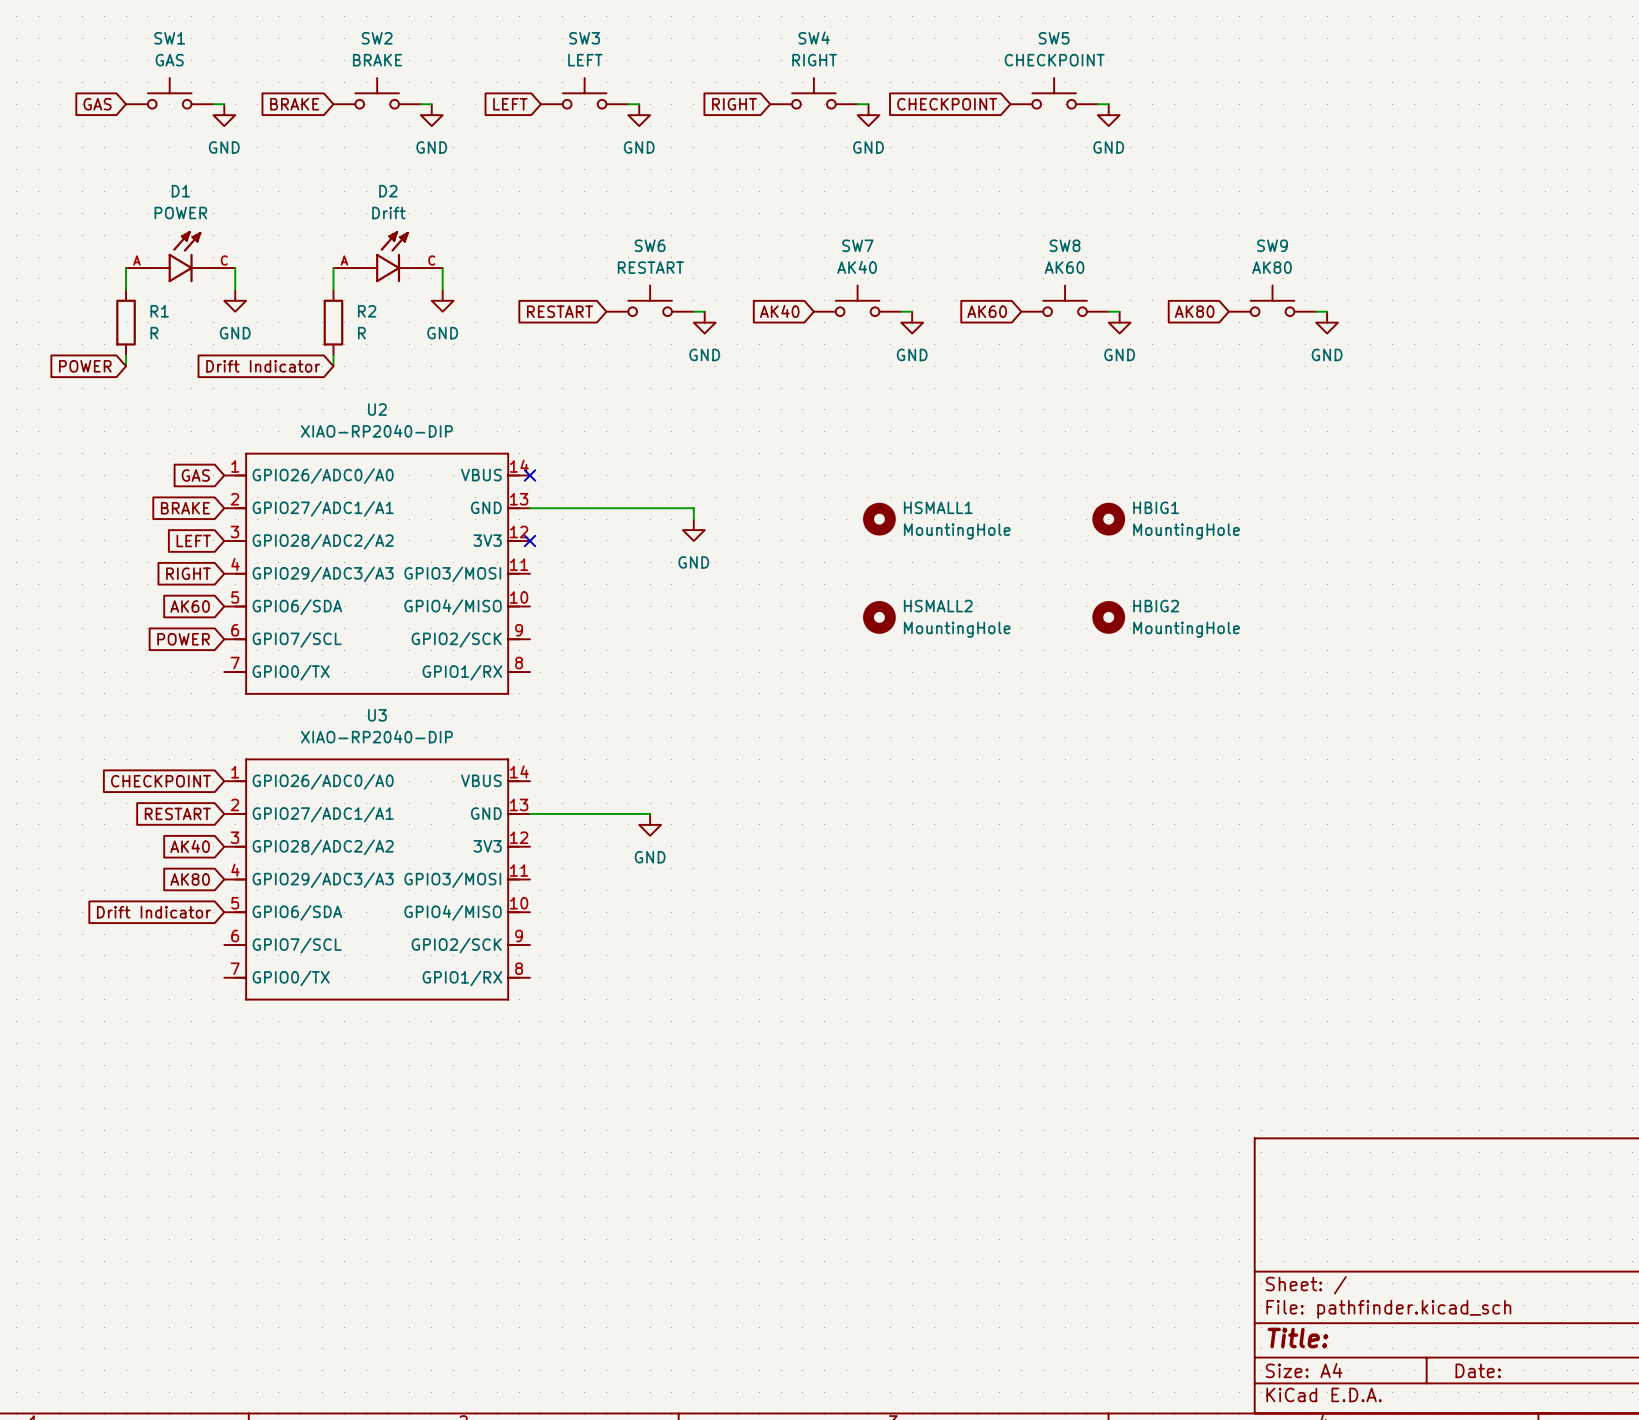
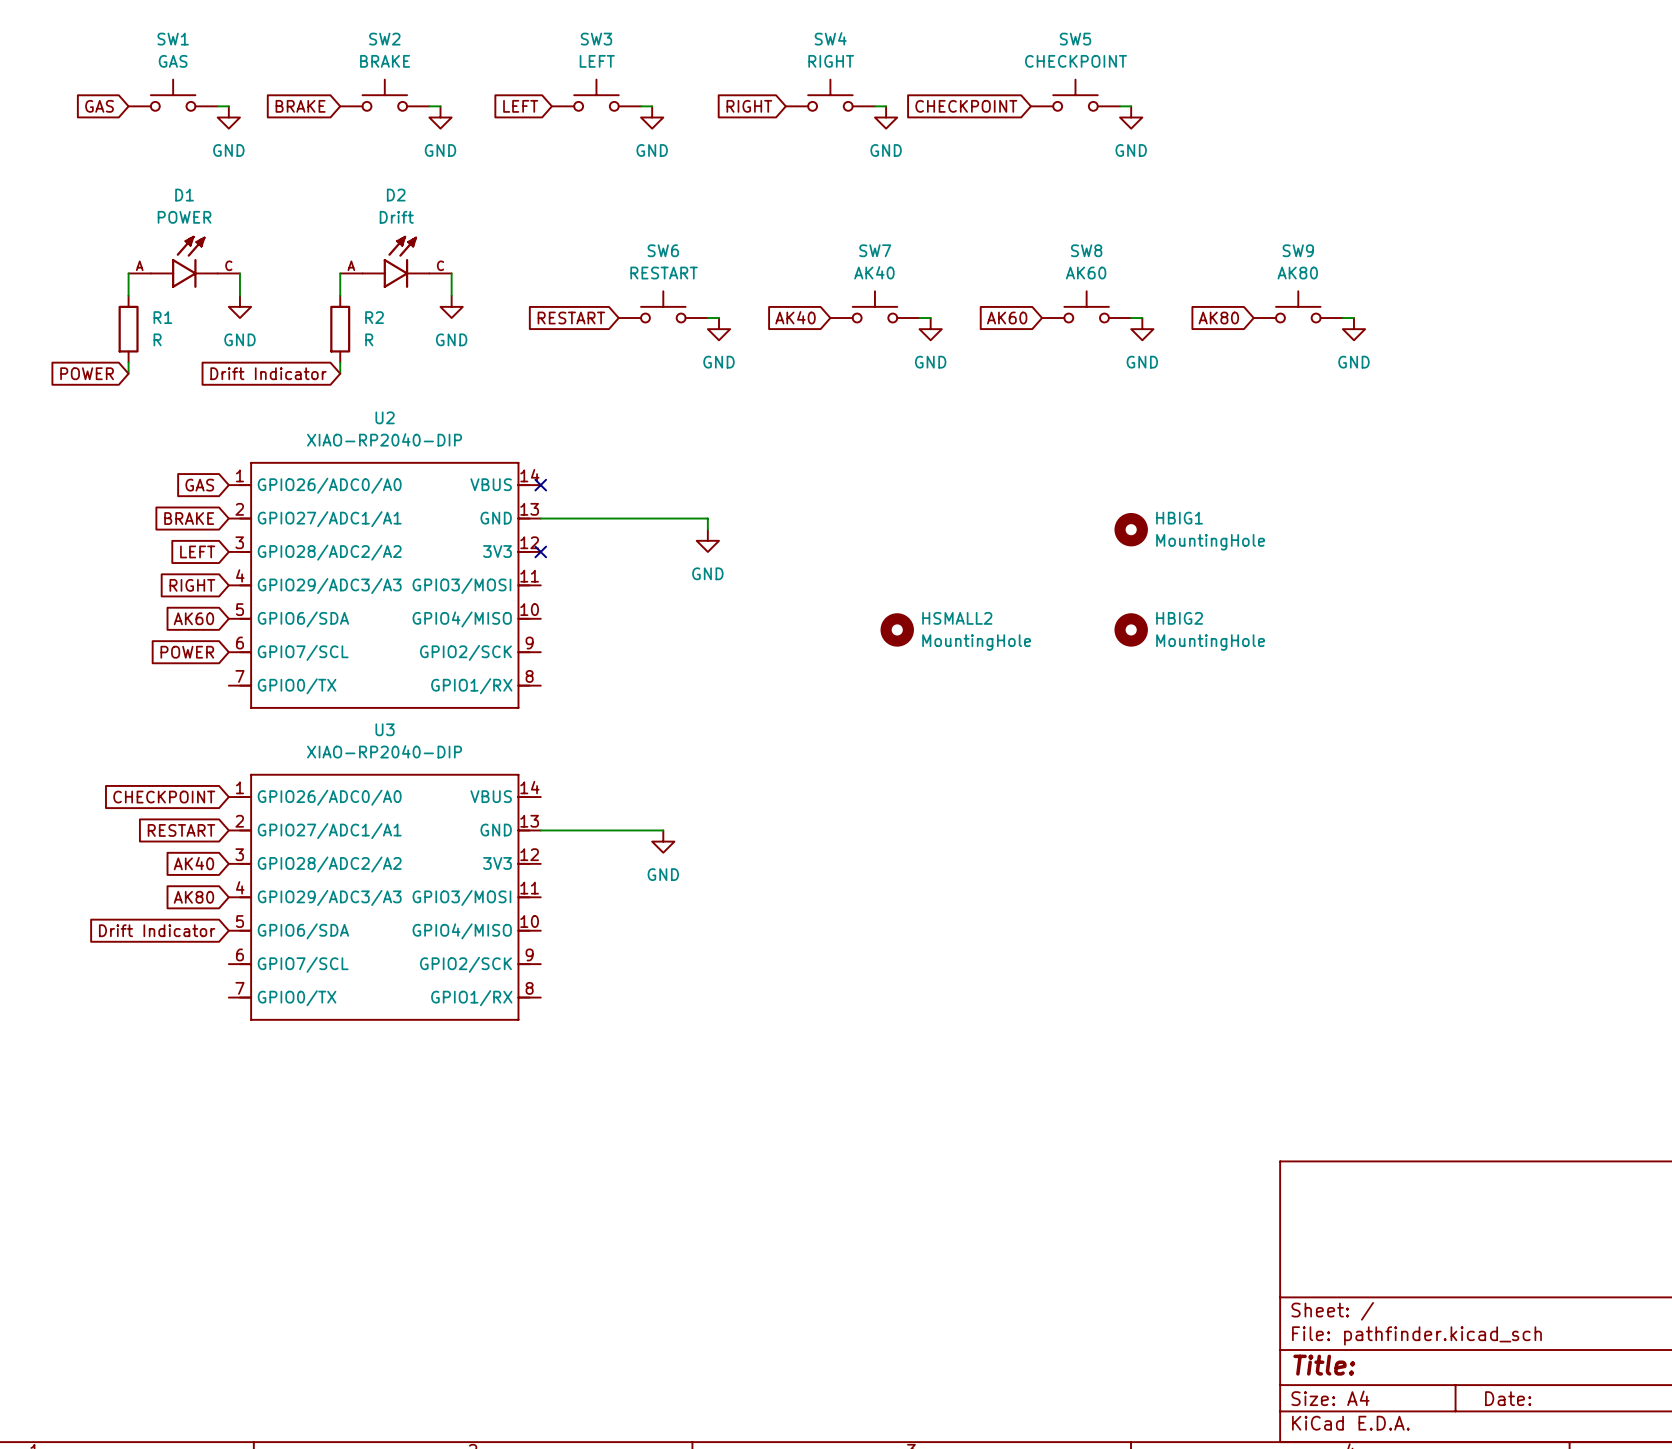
HSMALL1: MountingHole (879, 519) -> none

